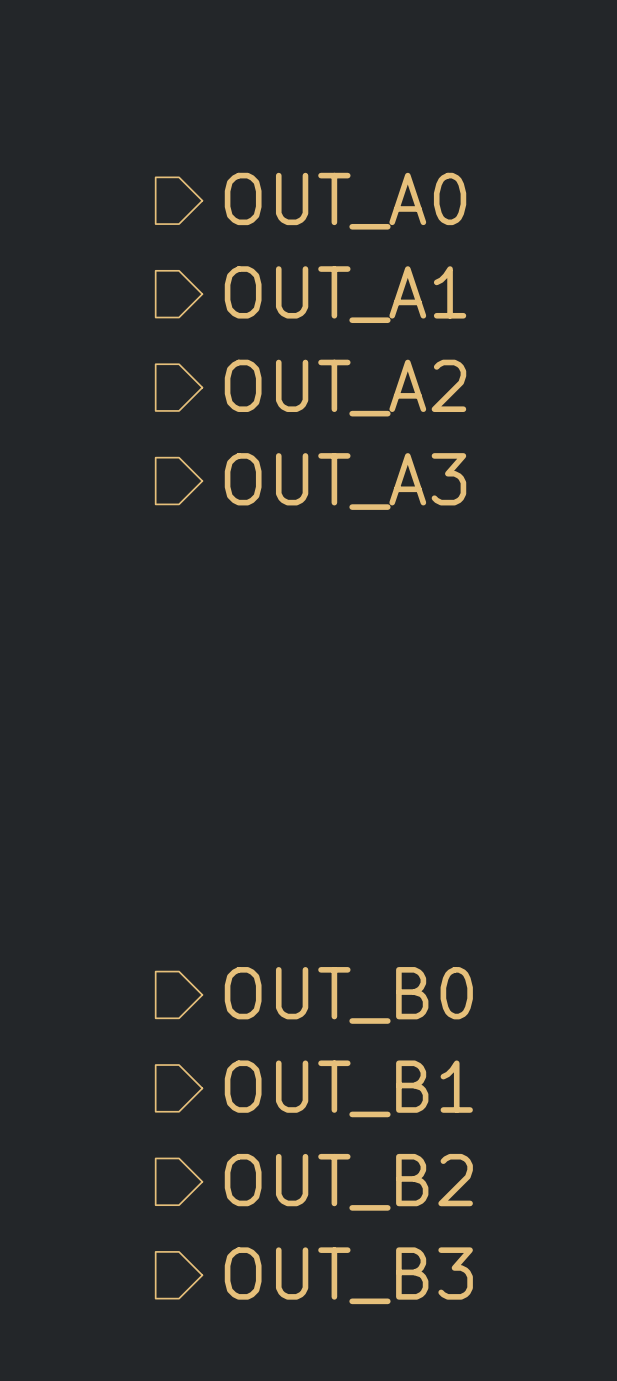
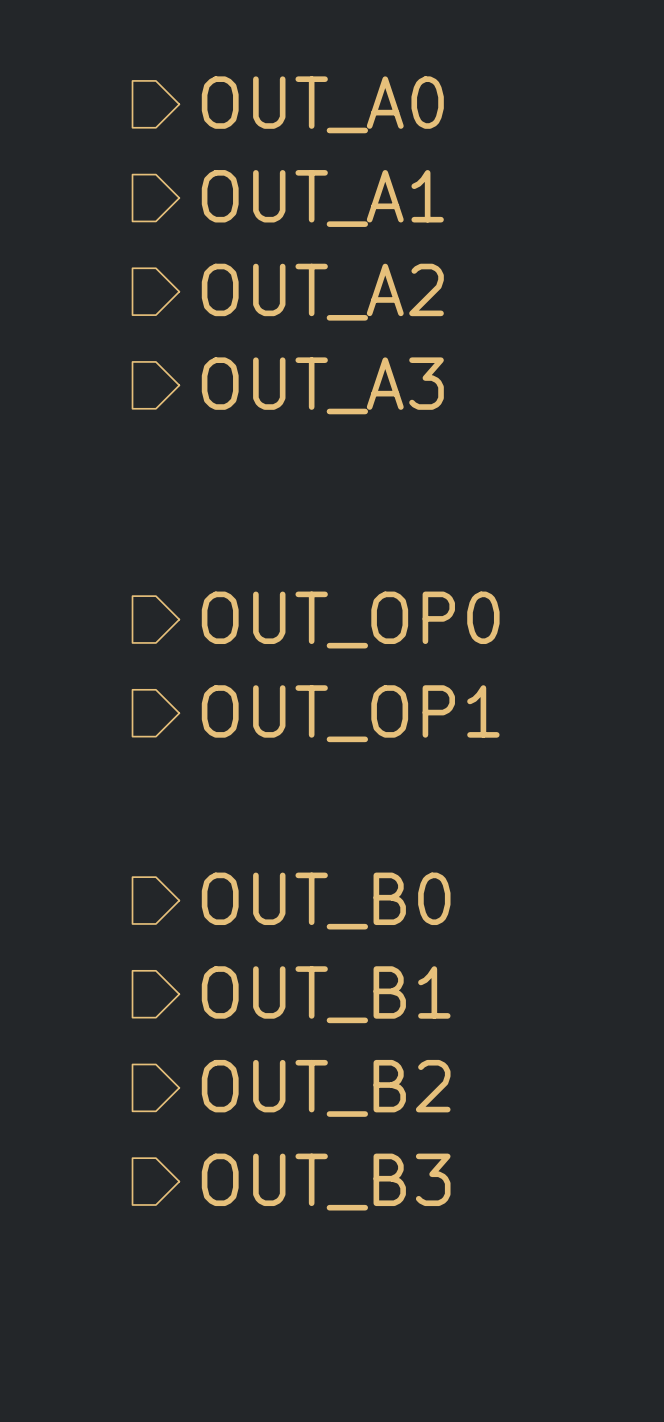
hierarchical label: none -> OUT_OP0 (350, 620)
hierarchical label: none -> OUT_OP1 (350, 713)

